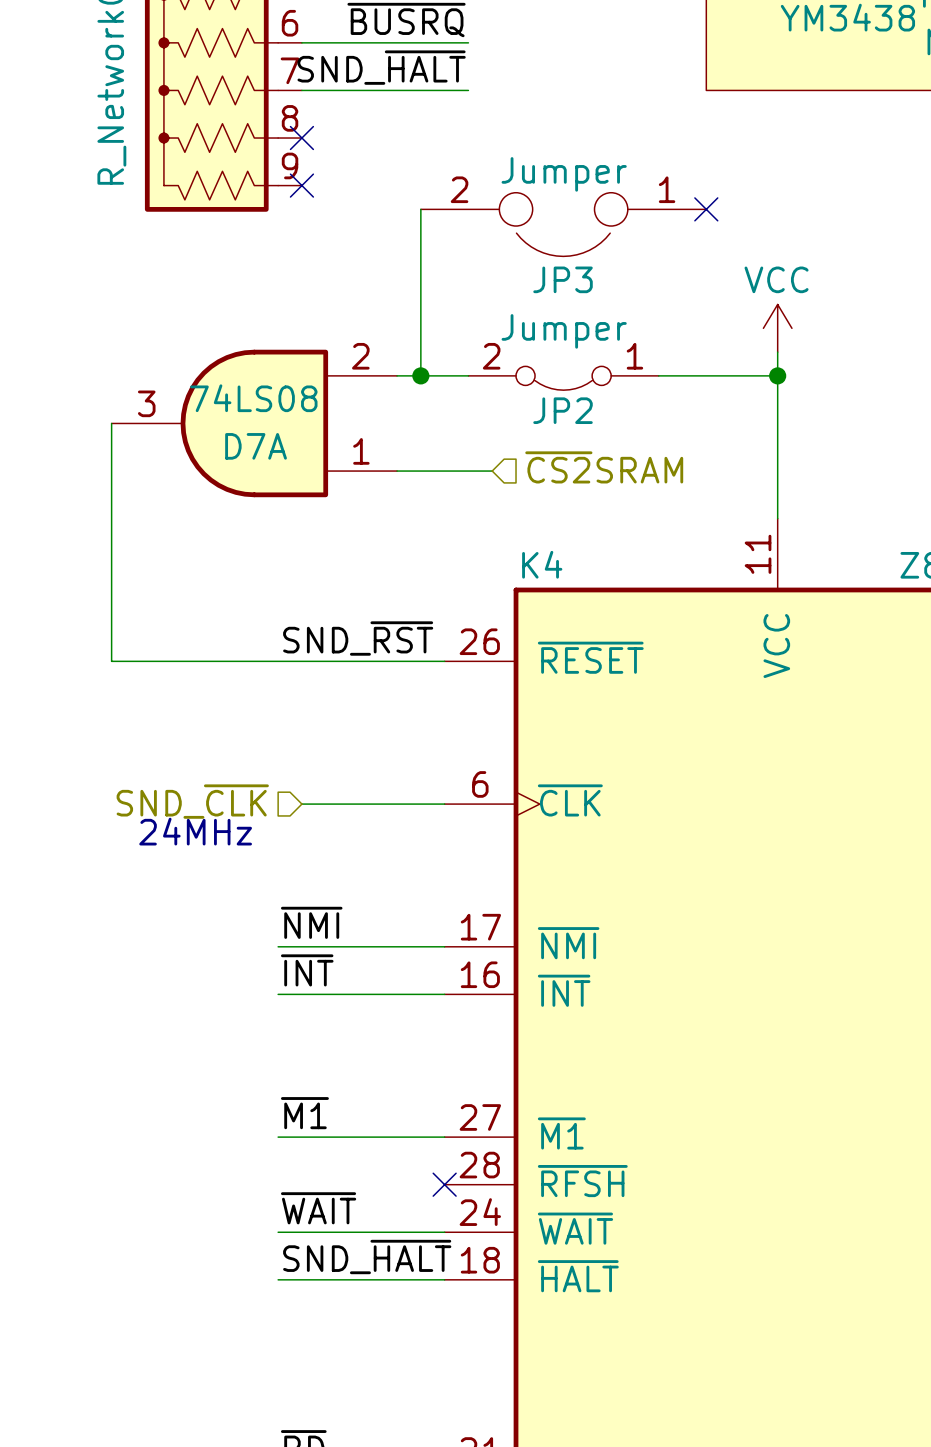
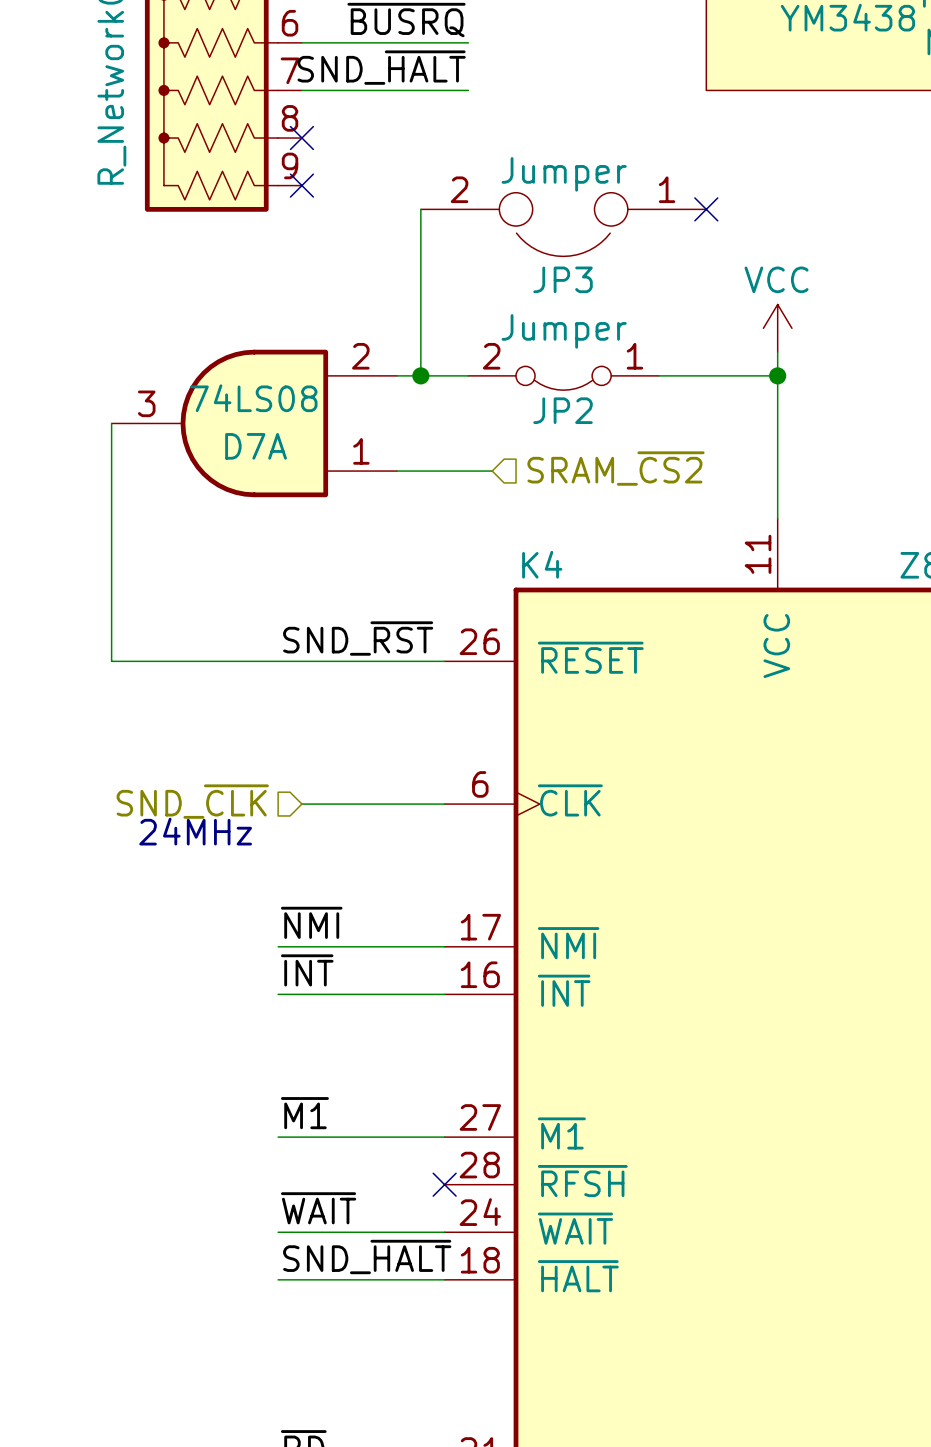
hierarchical label: ~{CS2}SRAM (604, 467) -> SRAM_~{CS2} (616, 468)

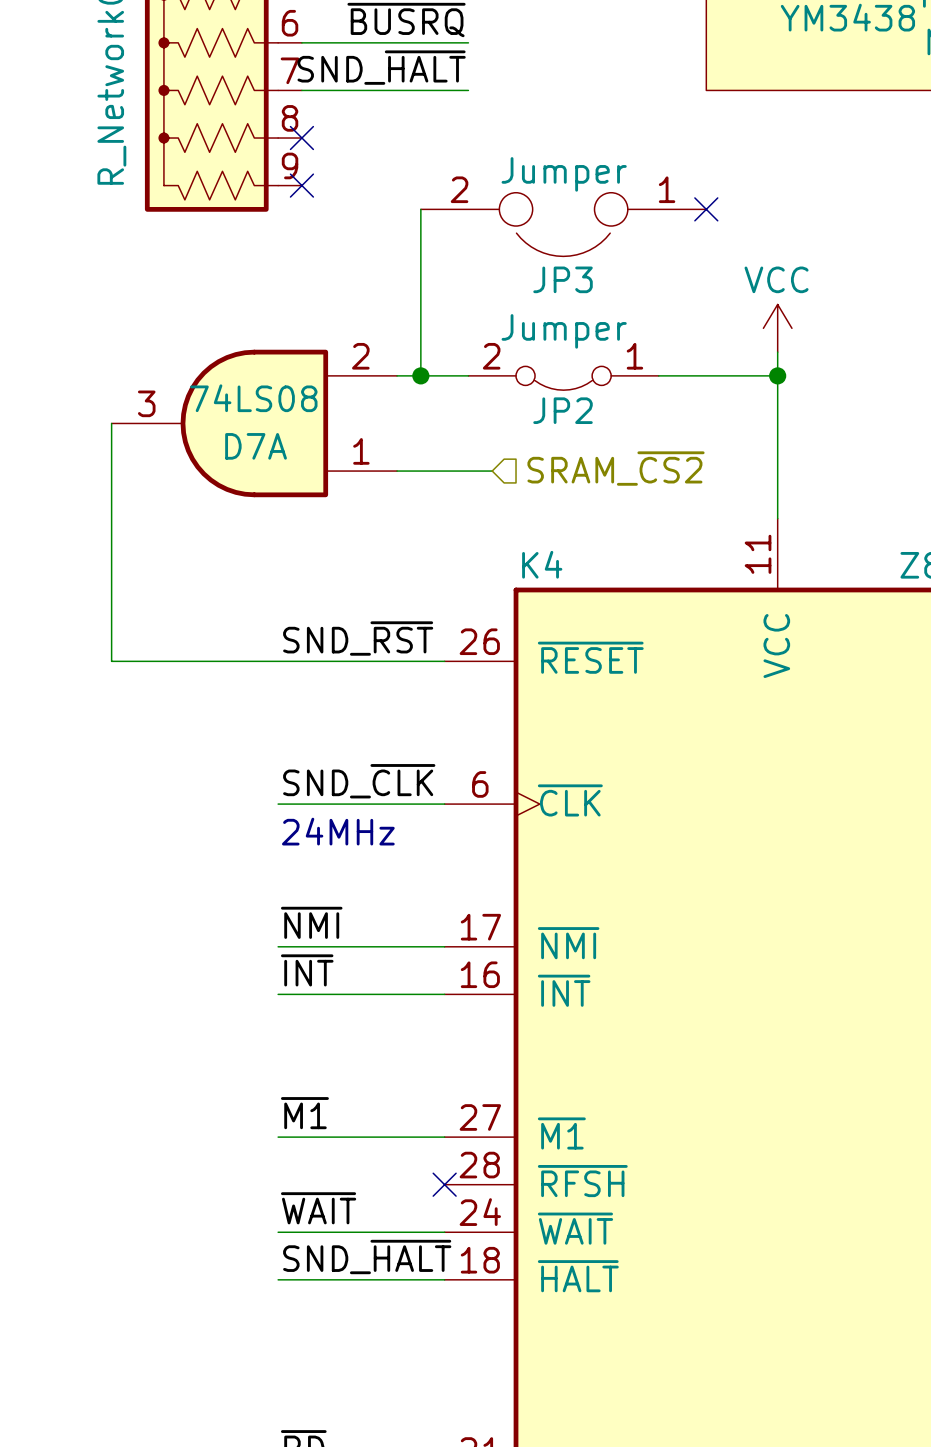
label: none -> SND_~{CLK} (359, 781)
hierarchical label: SND_~{CLK} (192, 801) -> none
wire: none -> (278, 804) (301, 804)
text position: 24MHz (195, 831) -> 24MHz (338, 831)

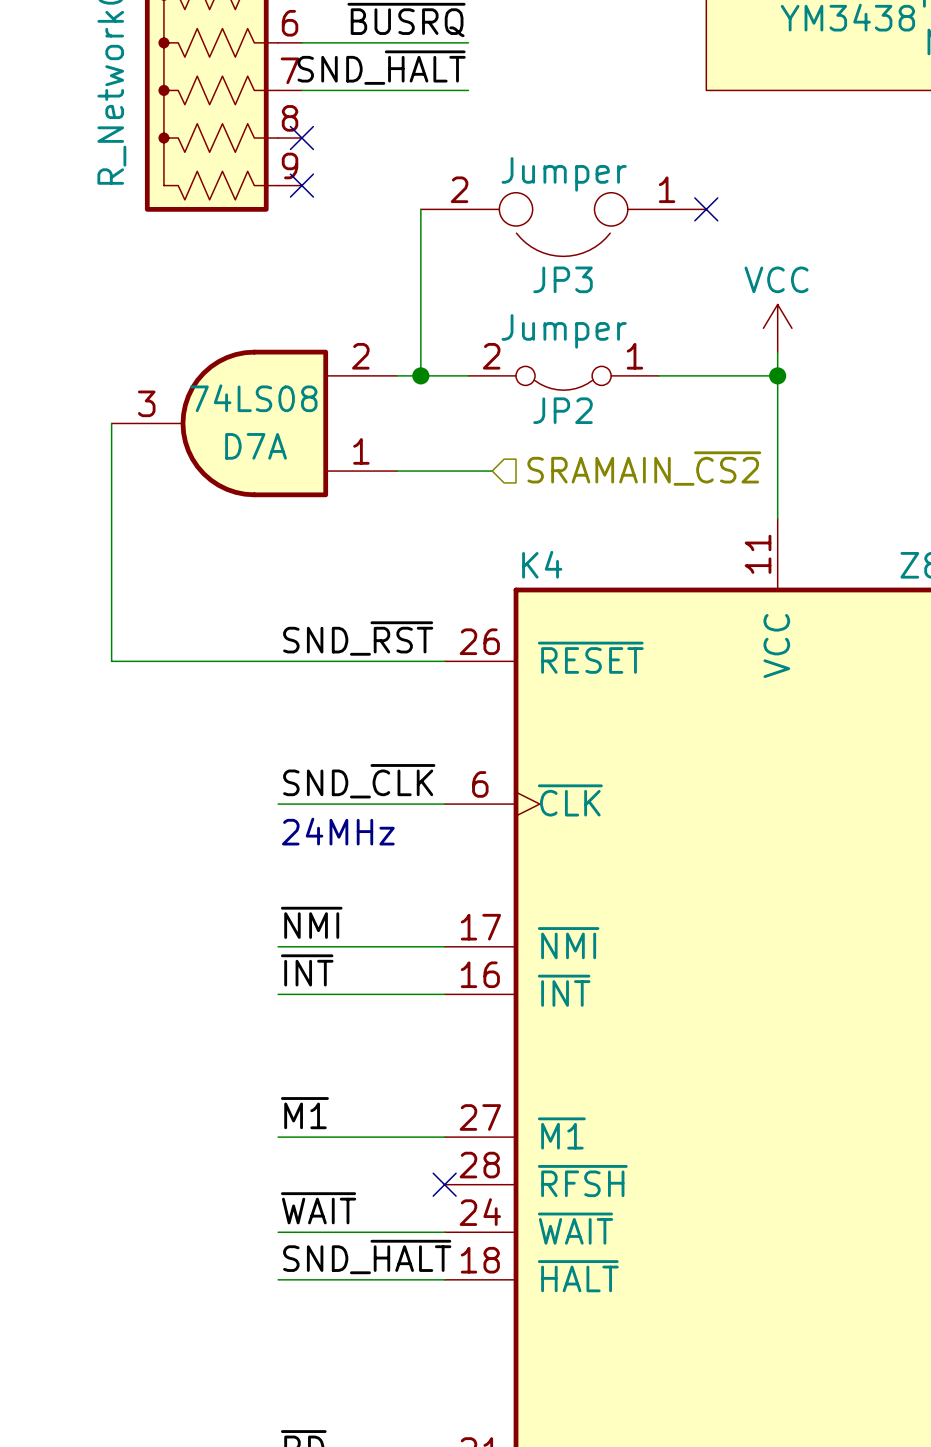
hierarchical label: SRAM_~{CS2} (616, 468) -> SRAMAIN_~{CS2} (644, 468)

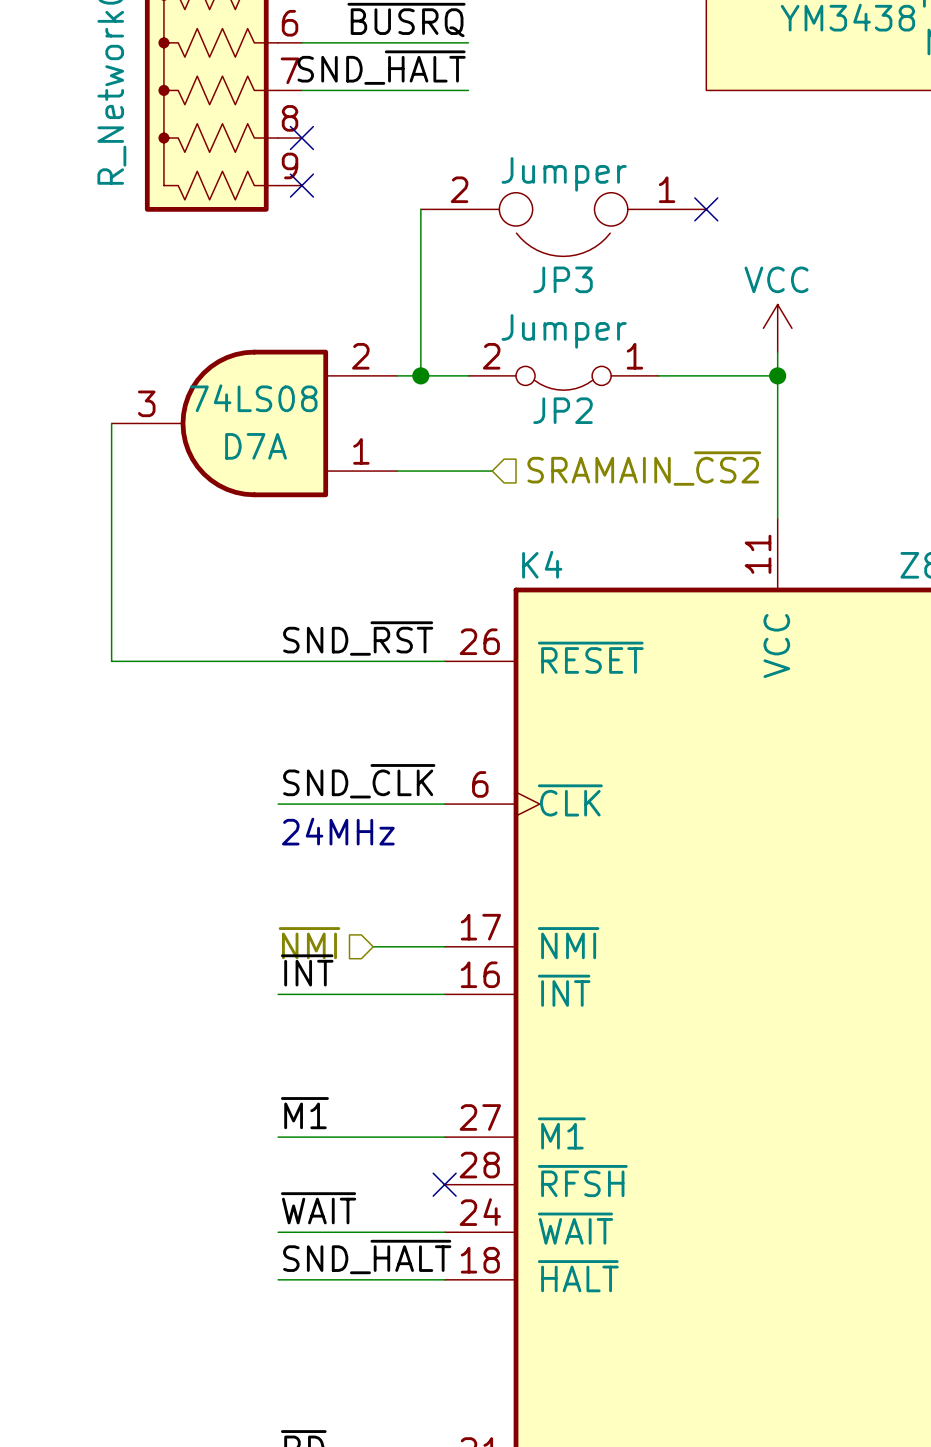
label: ~{NMI} (311, 922) -> none
hierarchical label: none -> ~{NMI} (309, 943)
wire: (278, 946) (373, 946) -> none

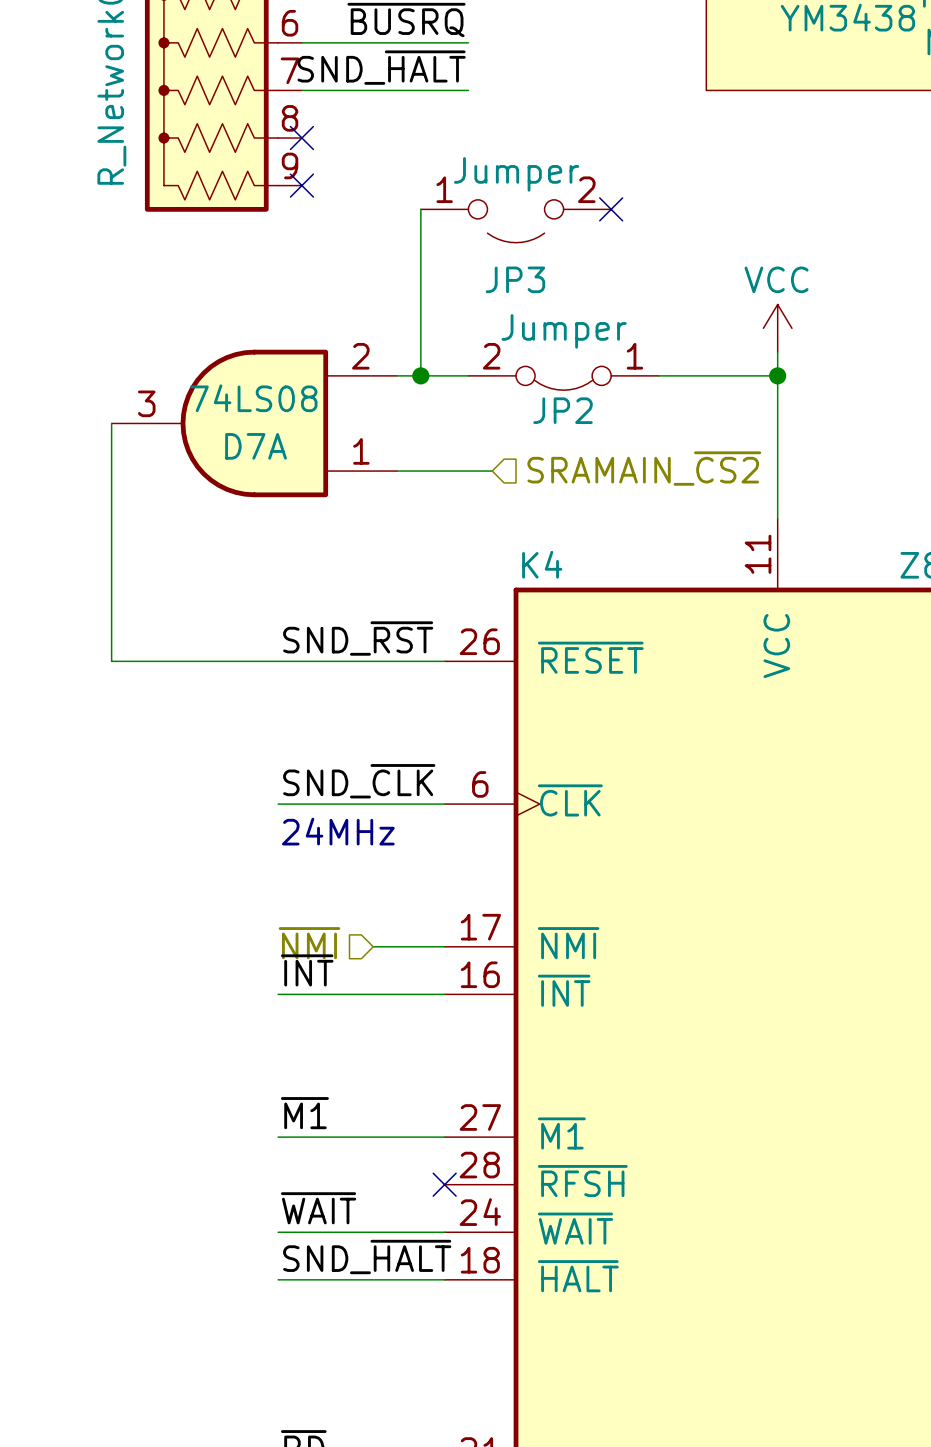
JP3 symbol: [420, 192, 707, 257] -> [420, 199, 612, 243]
no-connect mark position: (706, 209) -> (611, 209)

